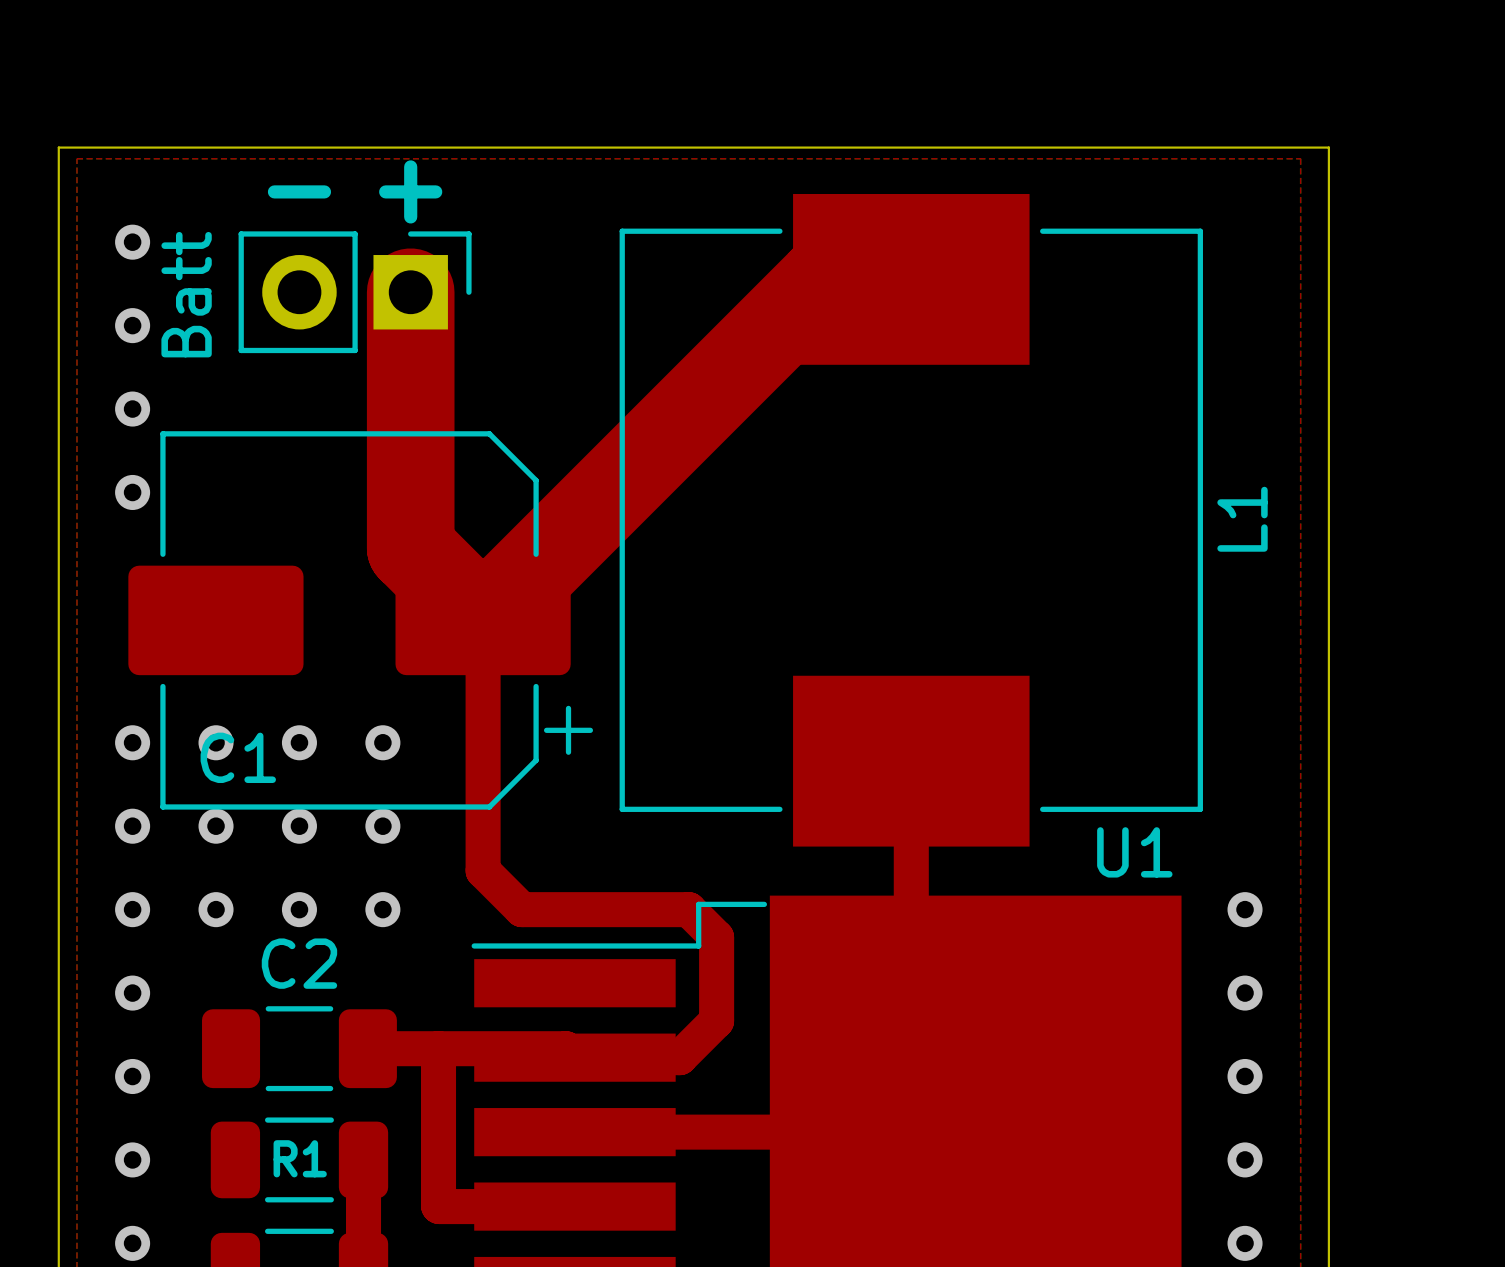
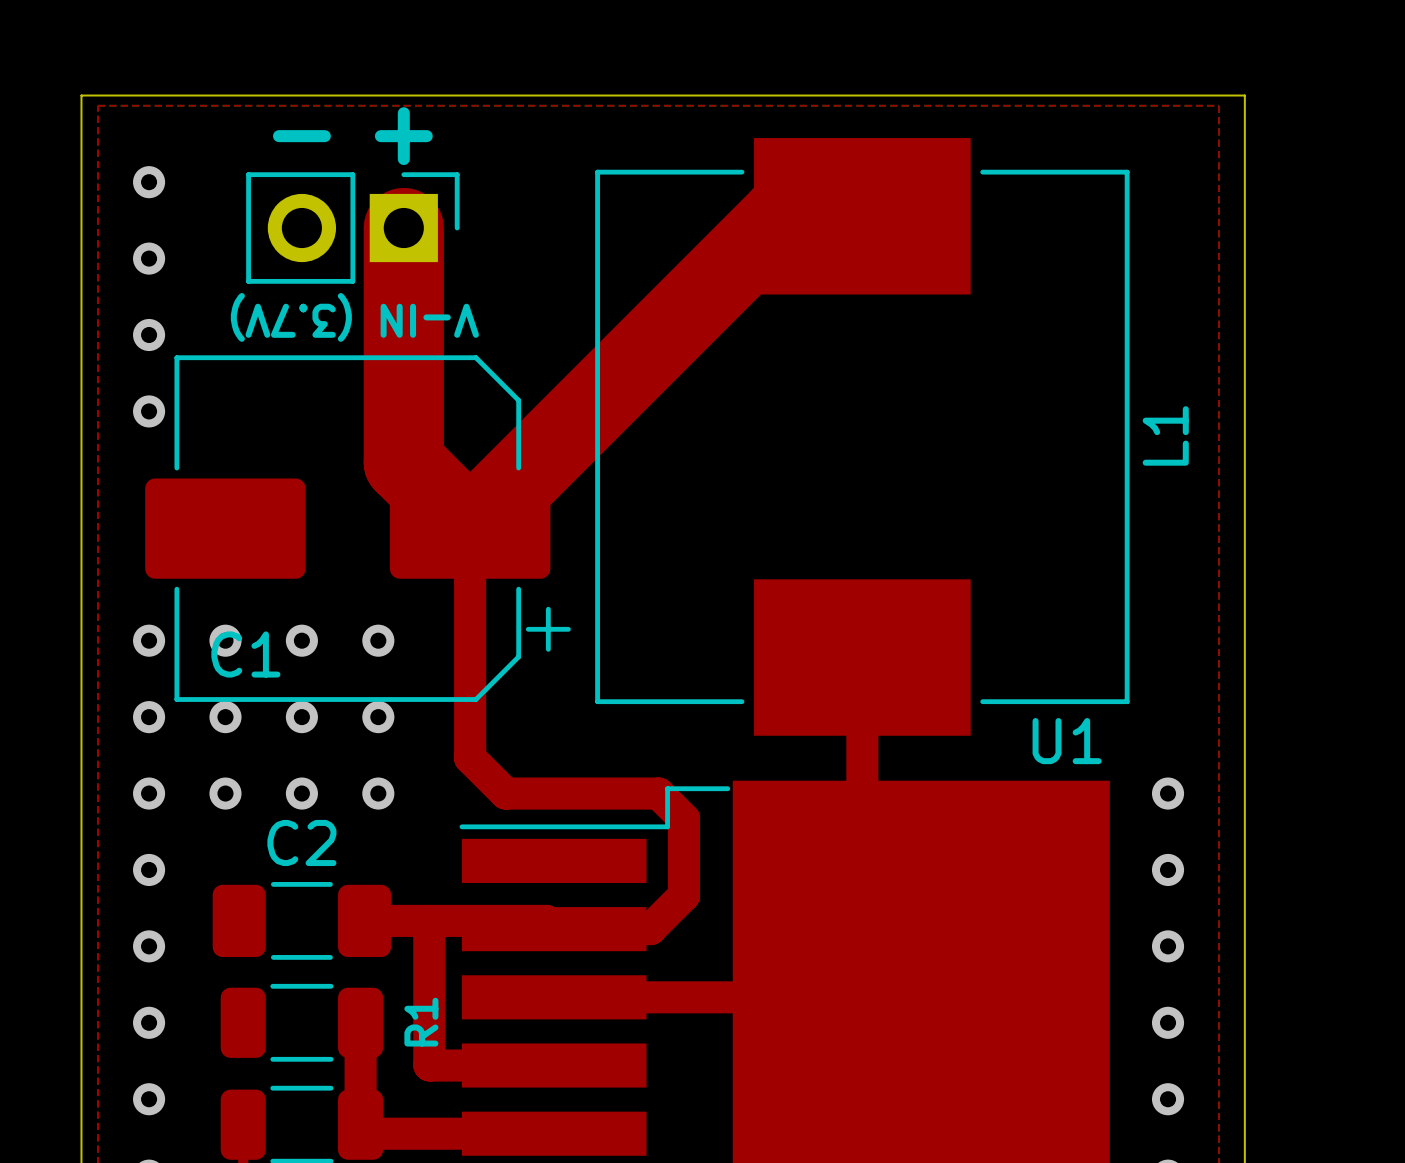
text: Batt (186, 294) -> none
text: none -> V-IN (3.7V) (354, 317)
R1 name rotation: 0° (300, 1158) -> 90° counterclockwise (421, 1022)
R1 name position: R1 (300, 1158) -> R1 (421, 1022)

